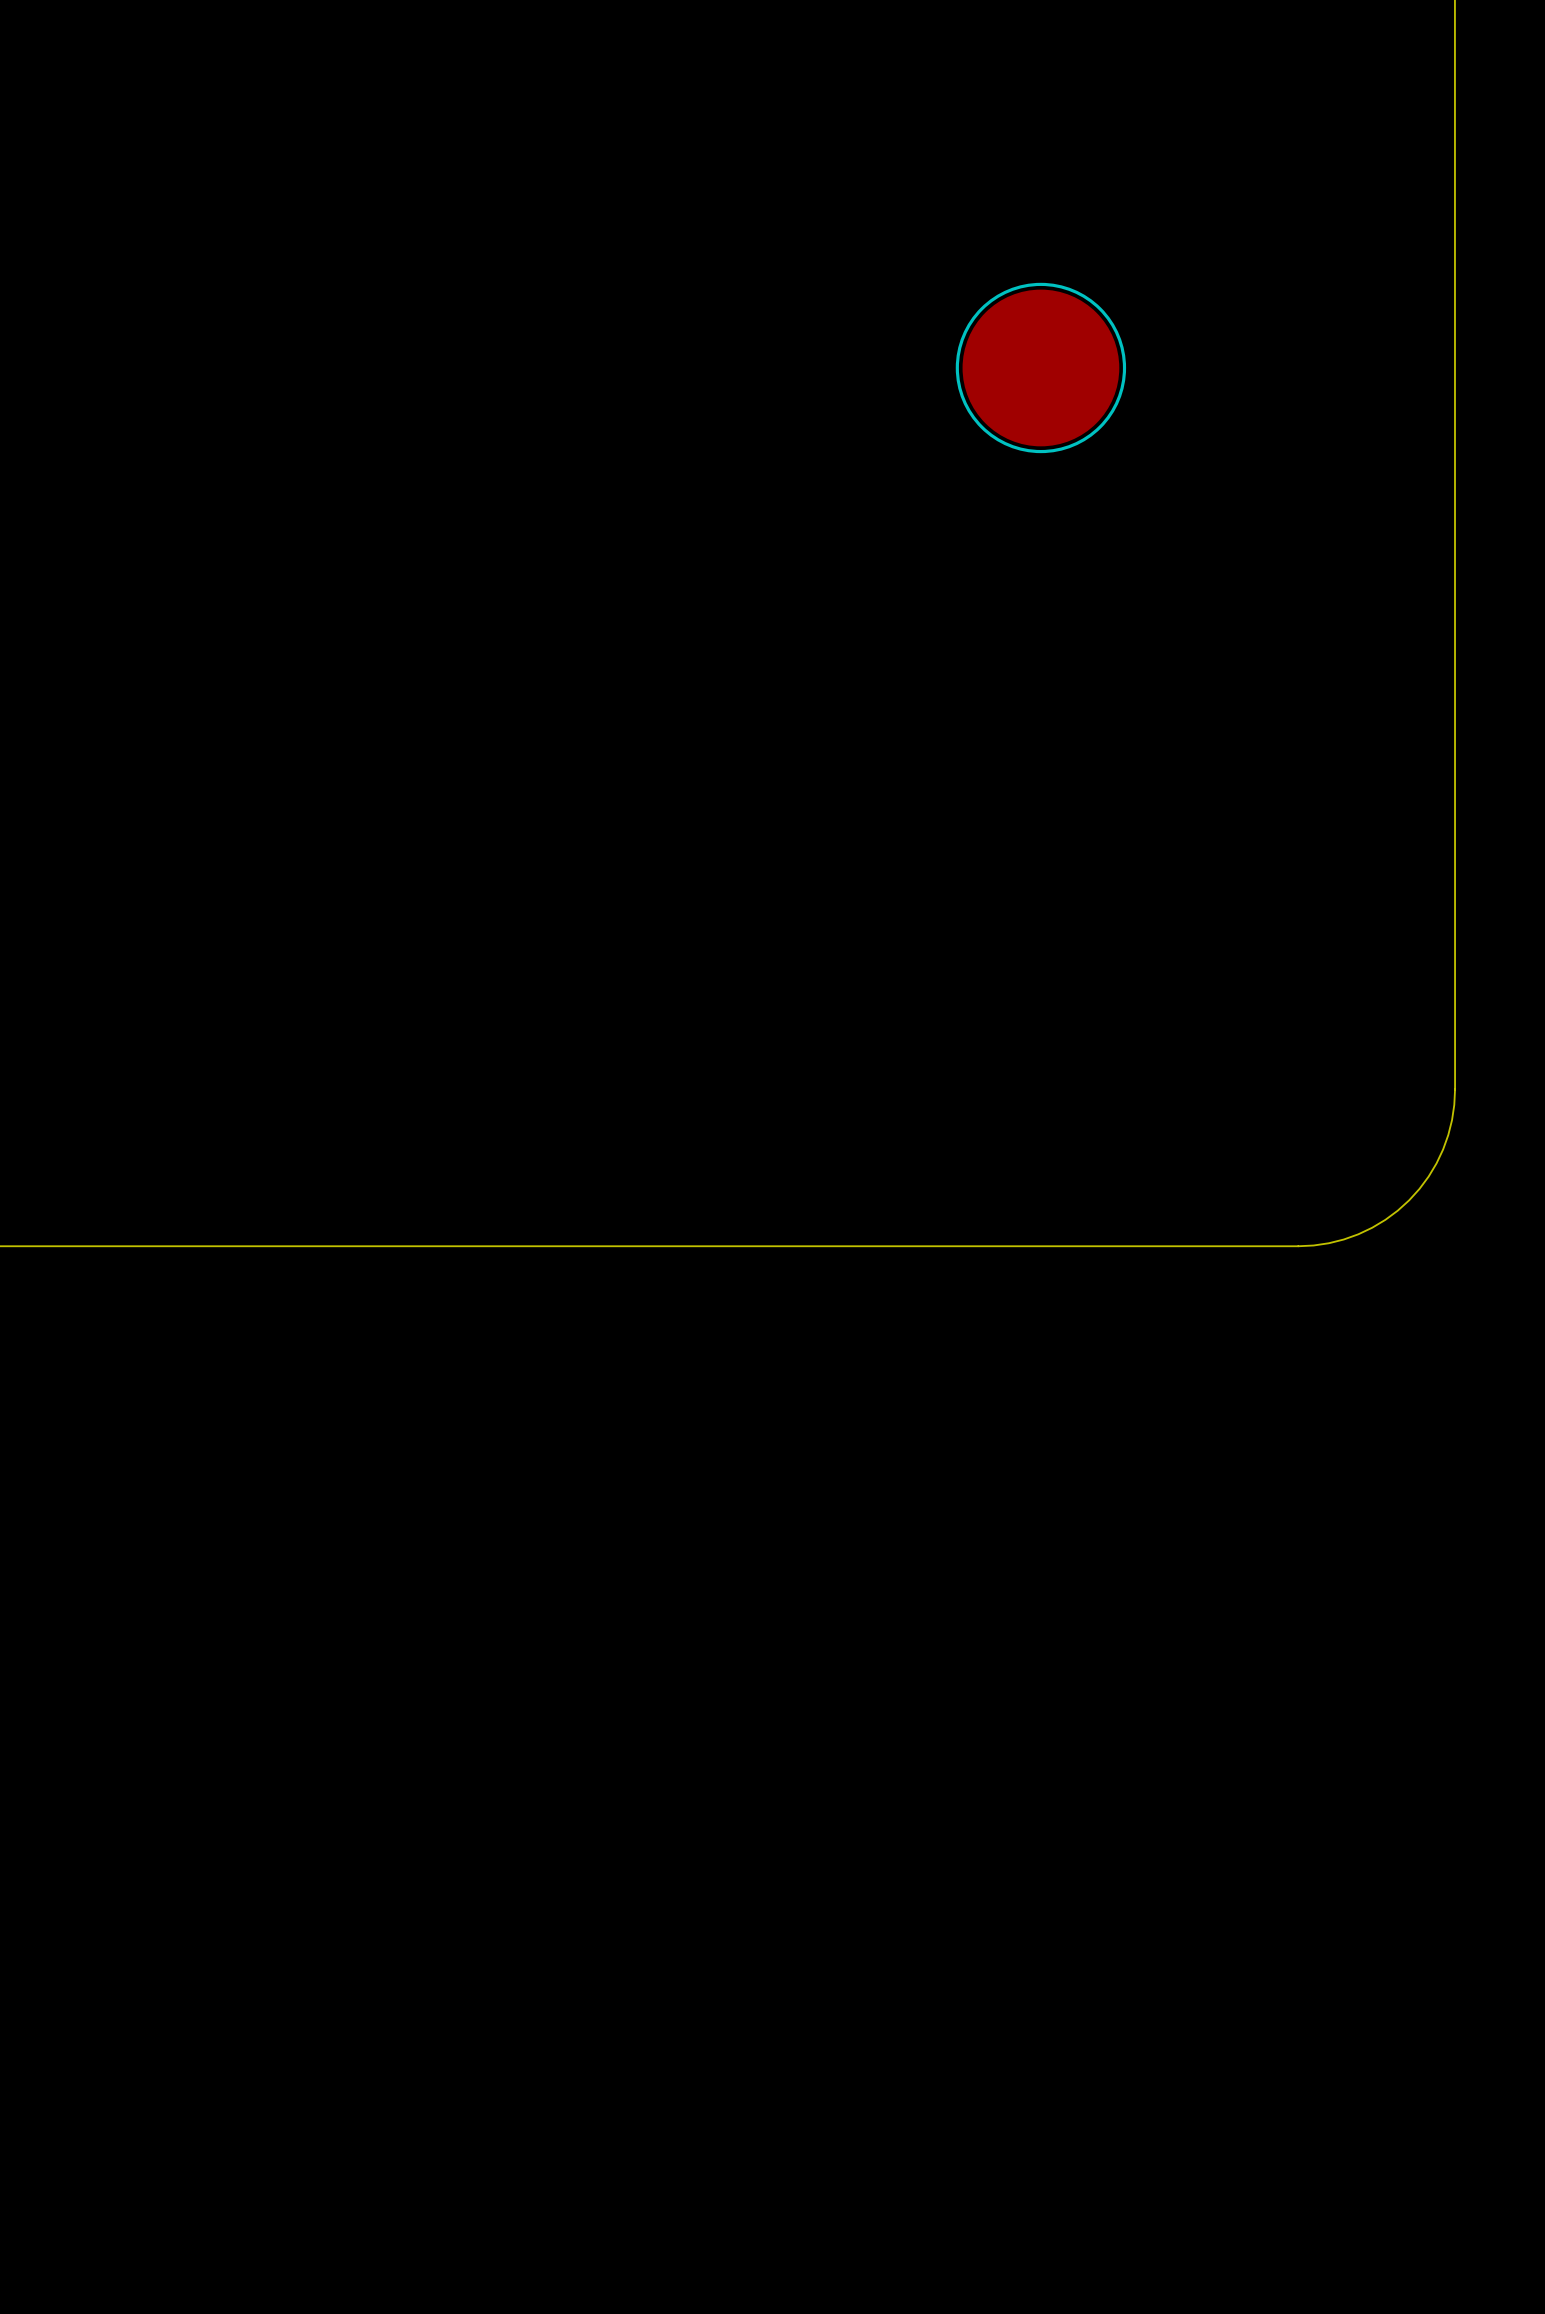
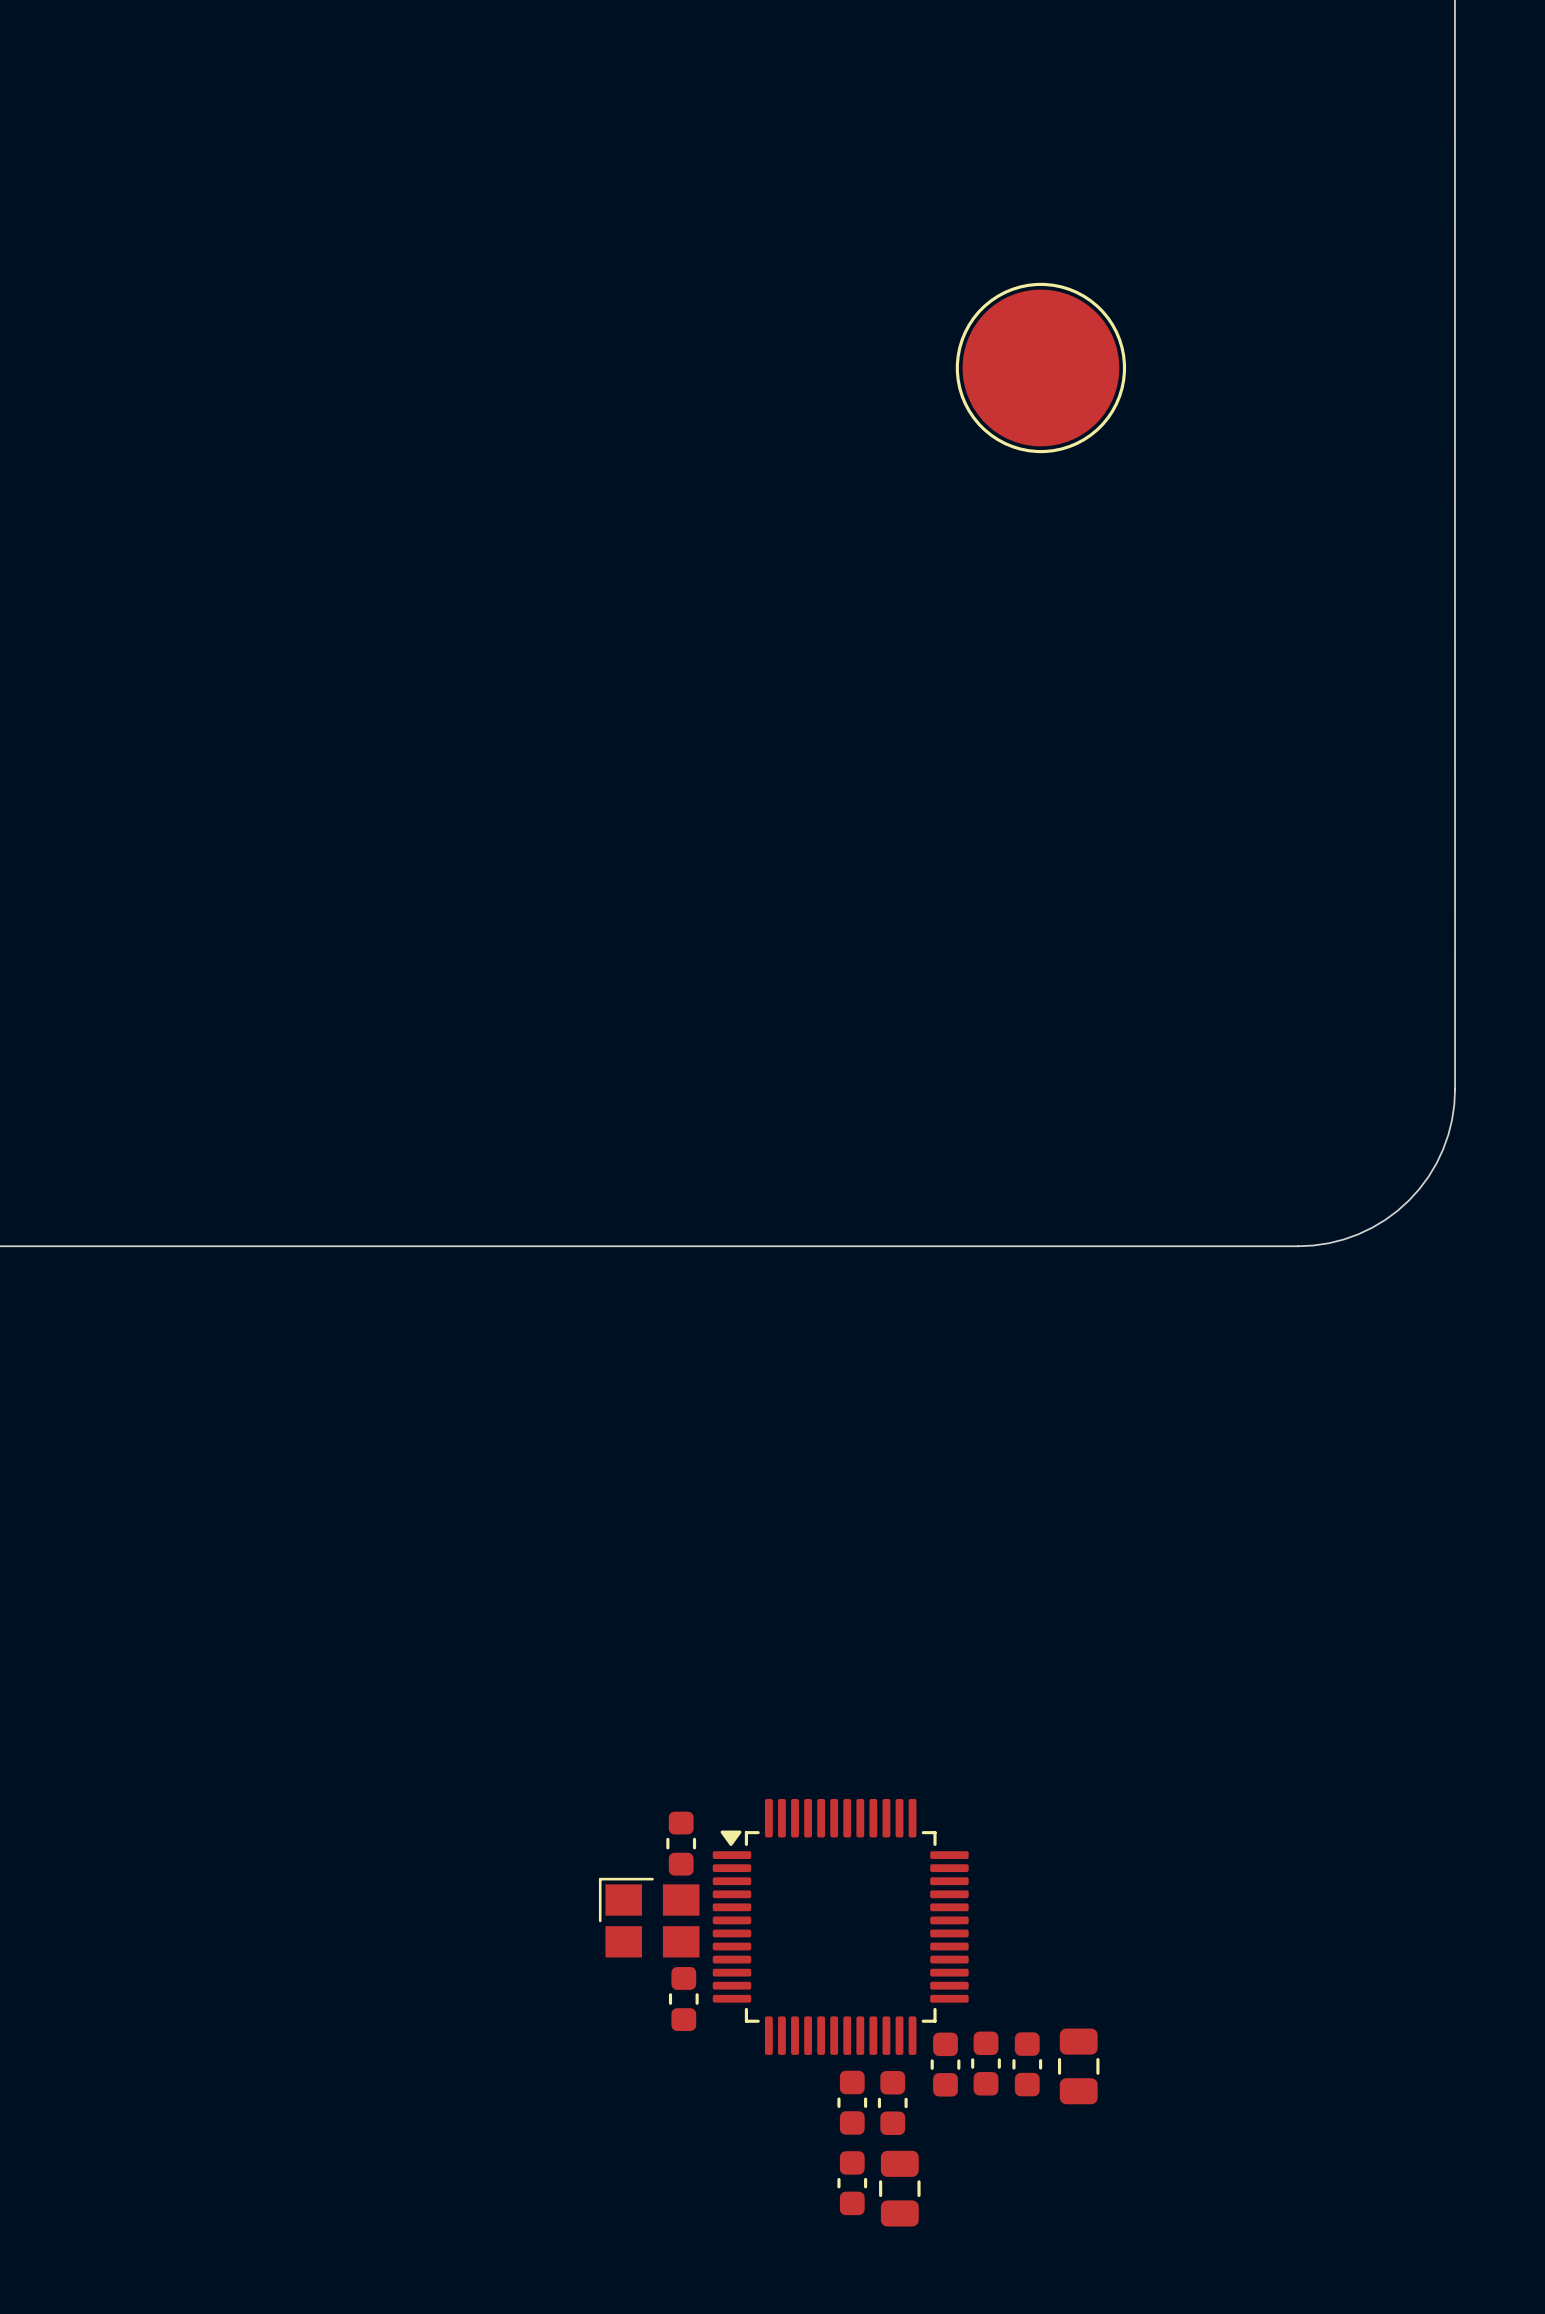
part: none -> (681, 1843)
part: none -> (649, 1917)
part: none -> (840, 1926)
part: none -> (683, 1999)
part: none -> (986, 2063)
part: none -> (945, 2064)
part: none -> (1027, 2064)
part: none -> (1078, 2066)
part: none -> (852, 2102)
part: none -> (892, 2102)
part: none -> (852, 2183)
part: none -> (899, 2188)

